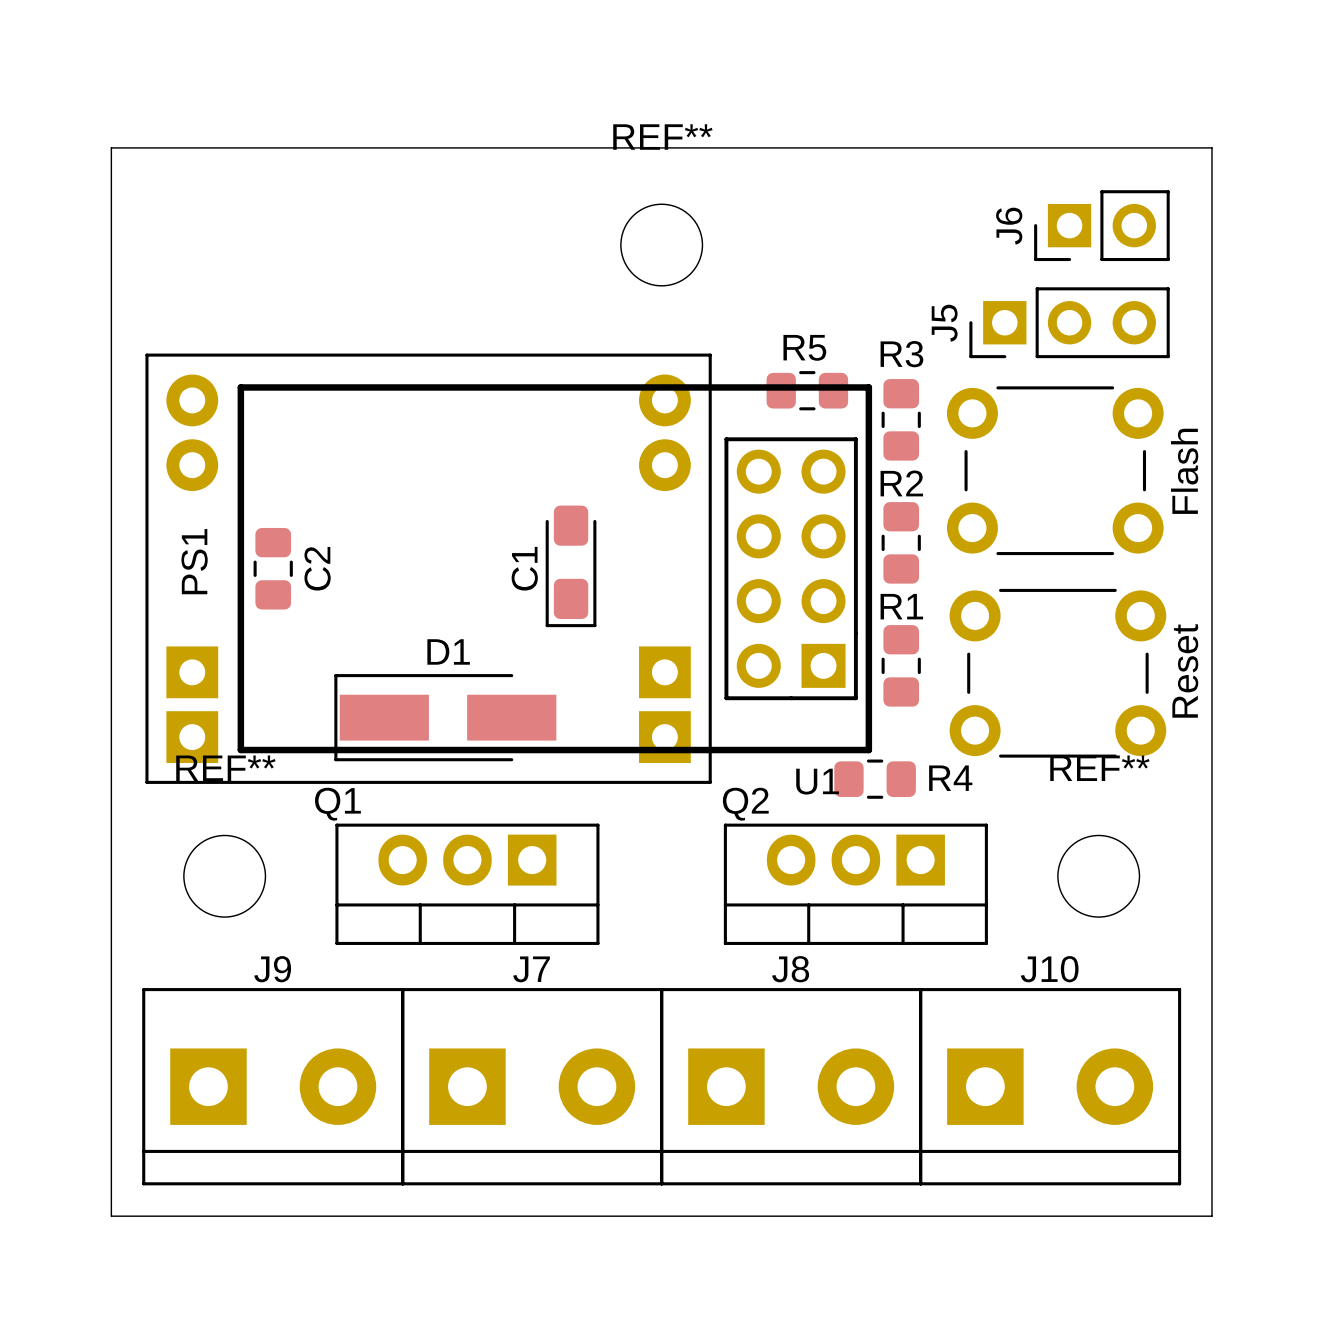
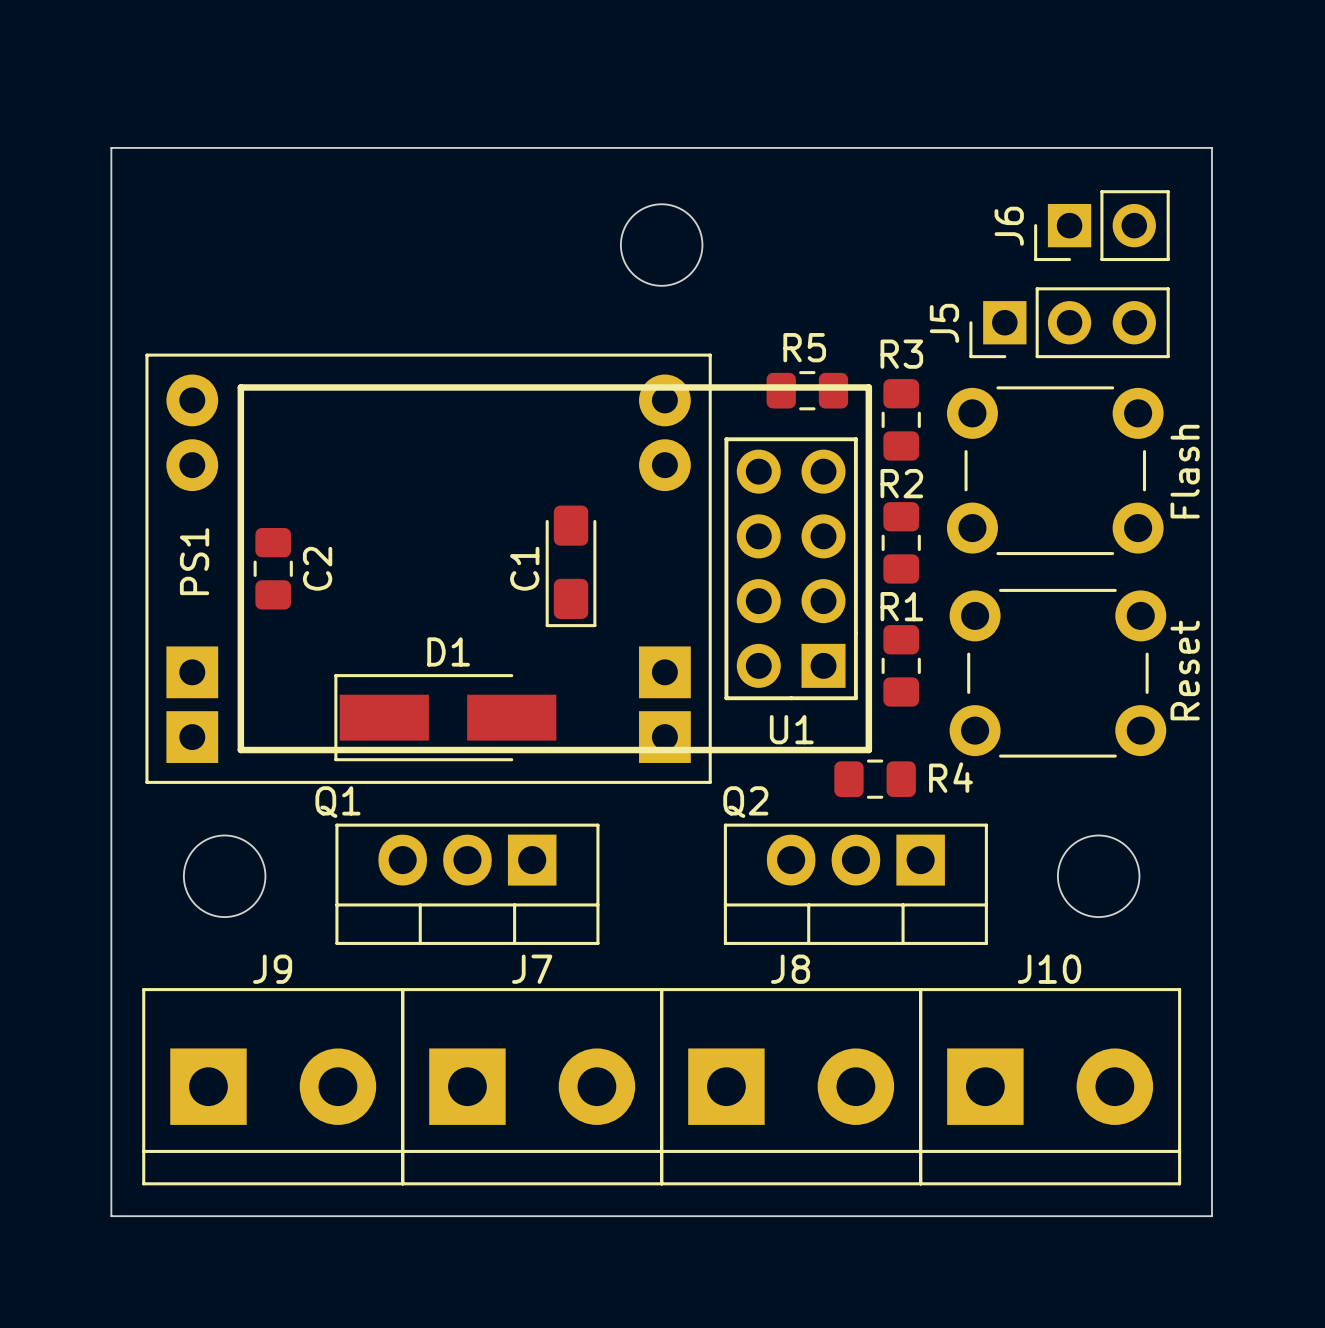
REF** name: REF** (662, 137) -> none
REF** name: REF** (225, 768) -> none
REF** name: REF** (1099, 768) -> none
U1 name position: U1 (817, 781) -> U1 (791, 729)

